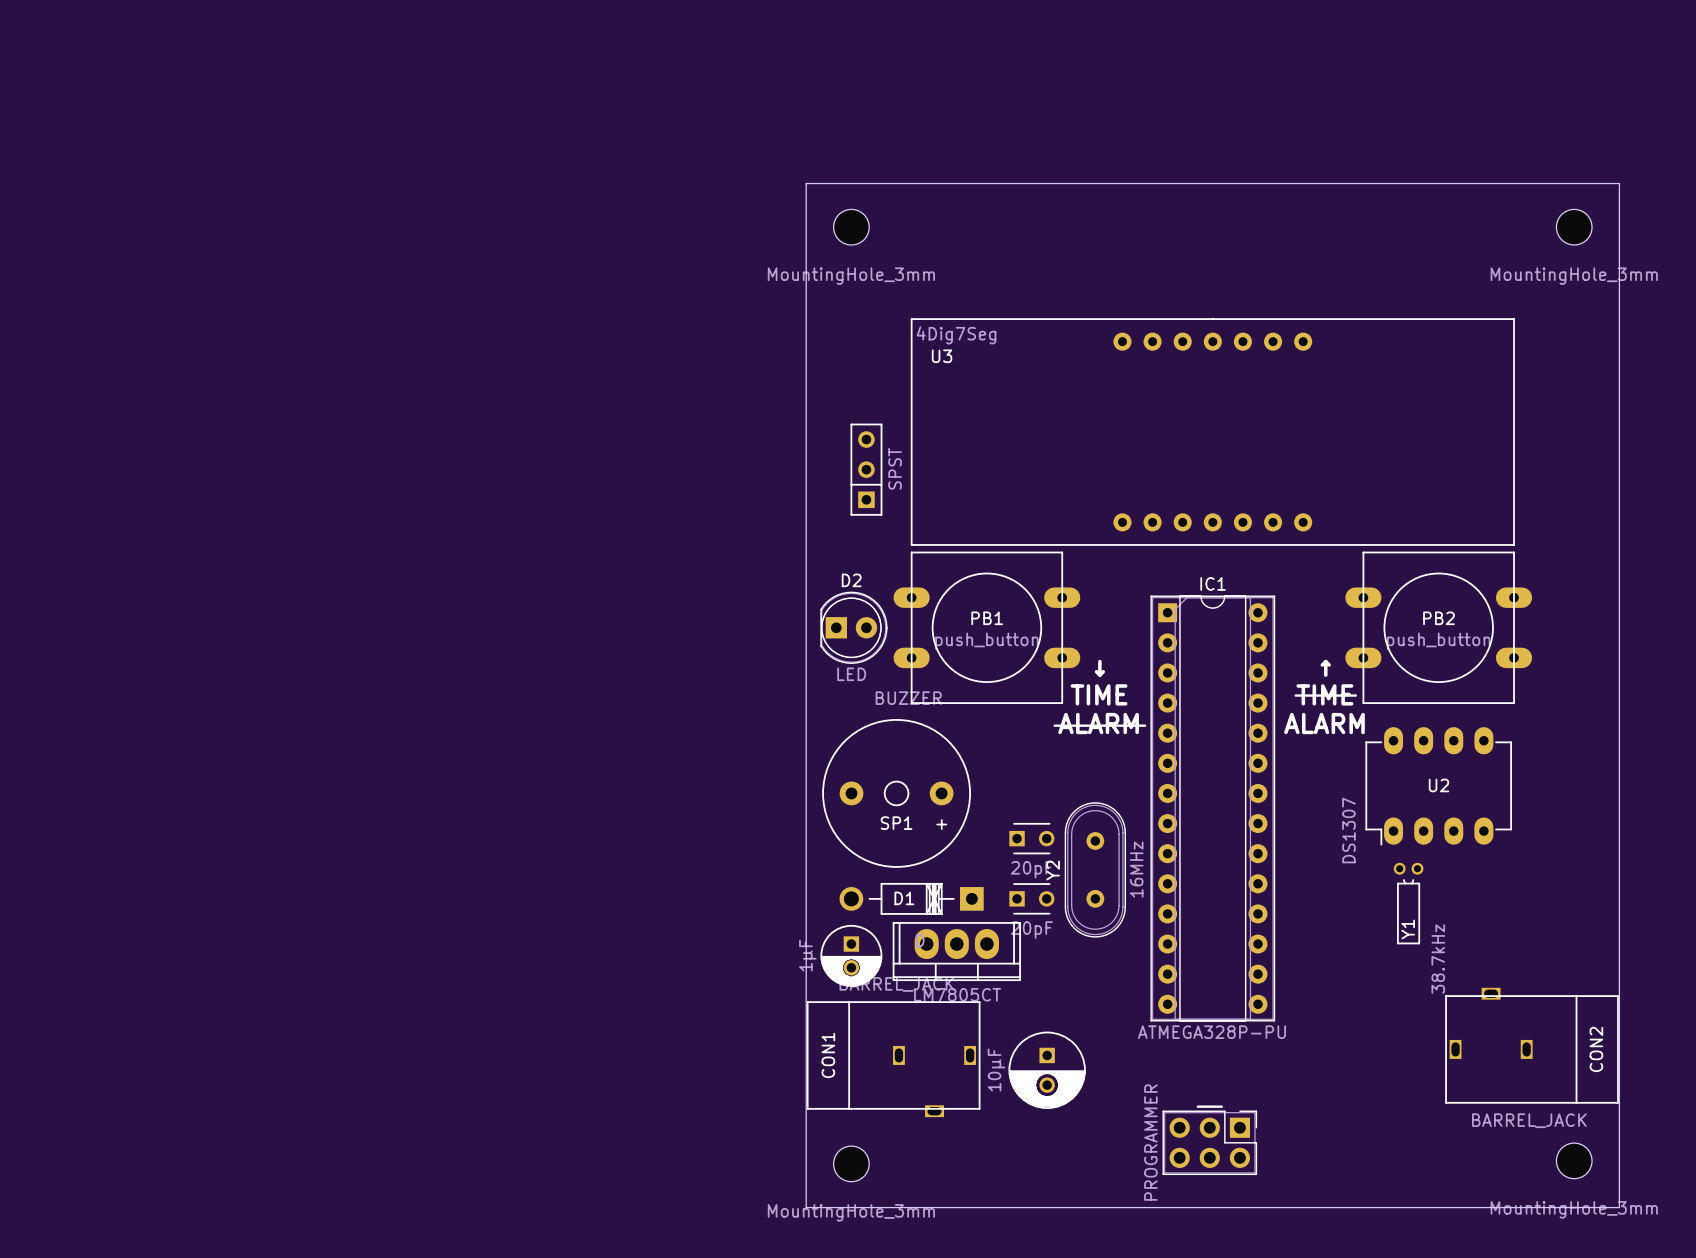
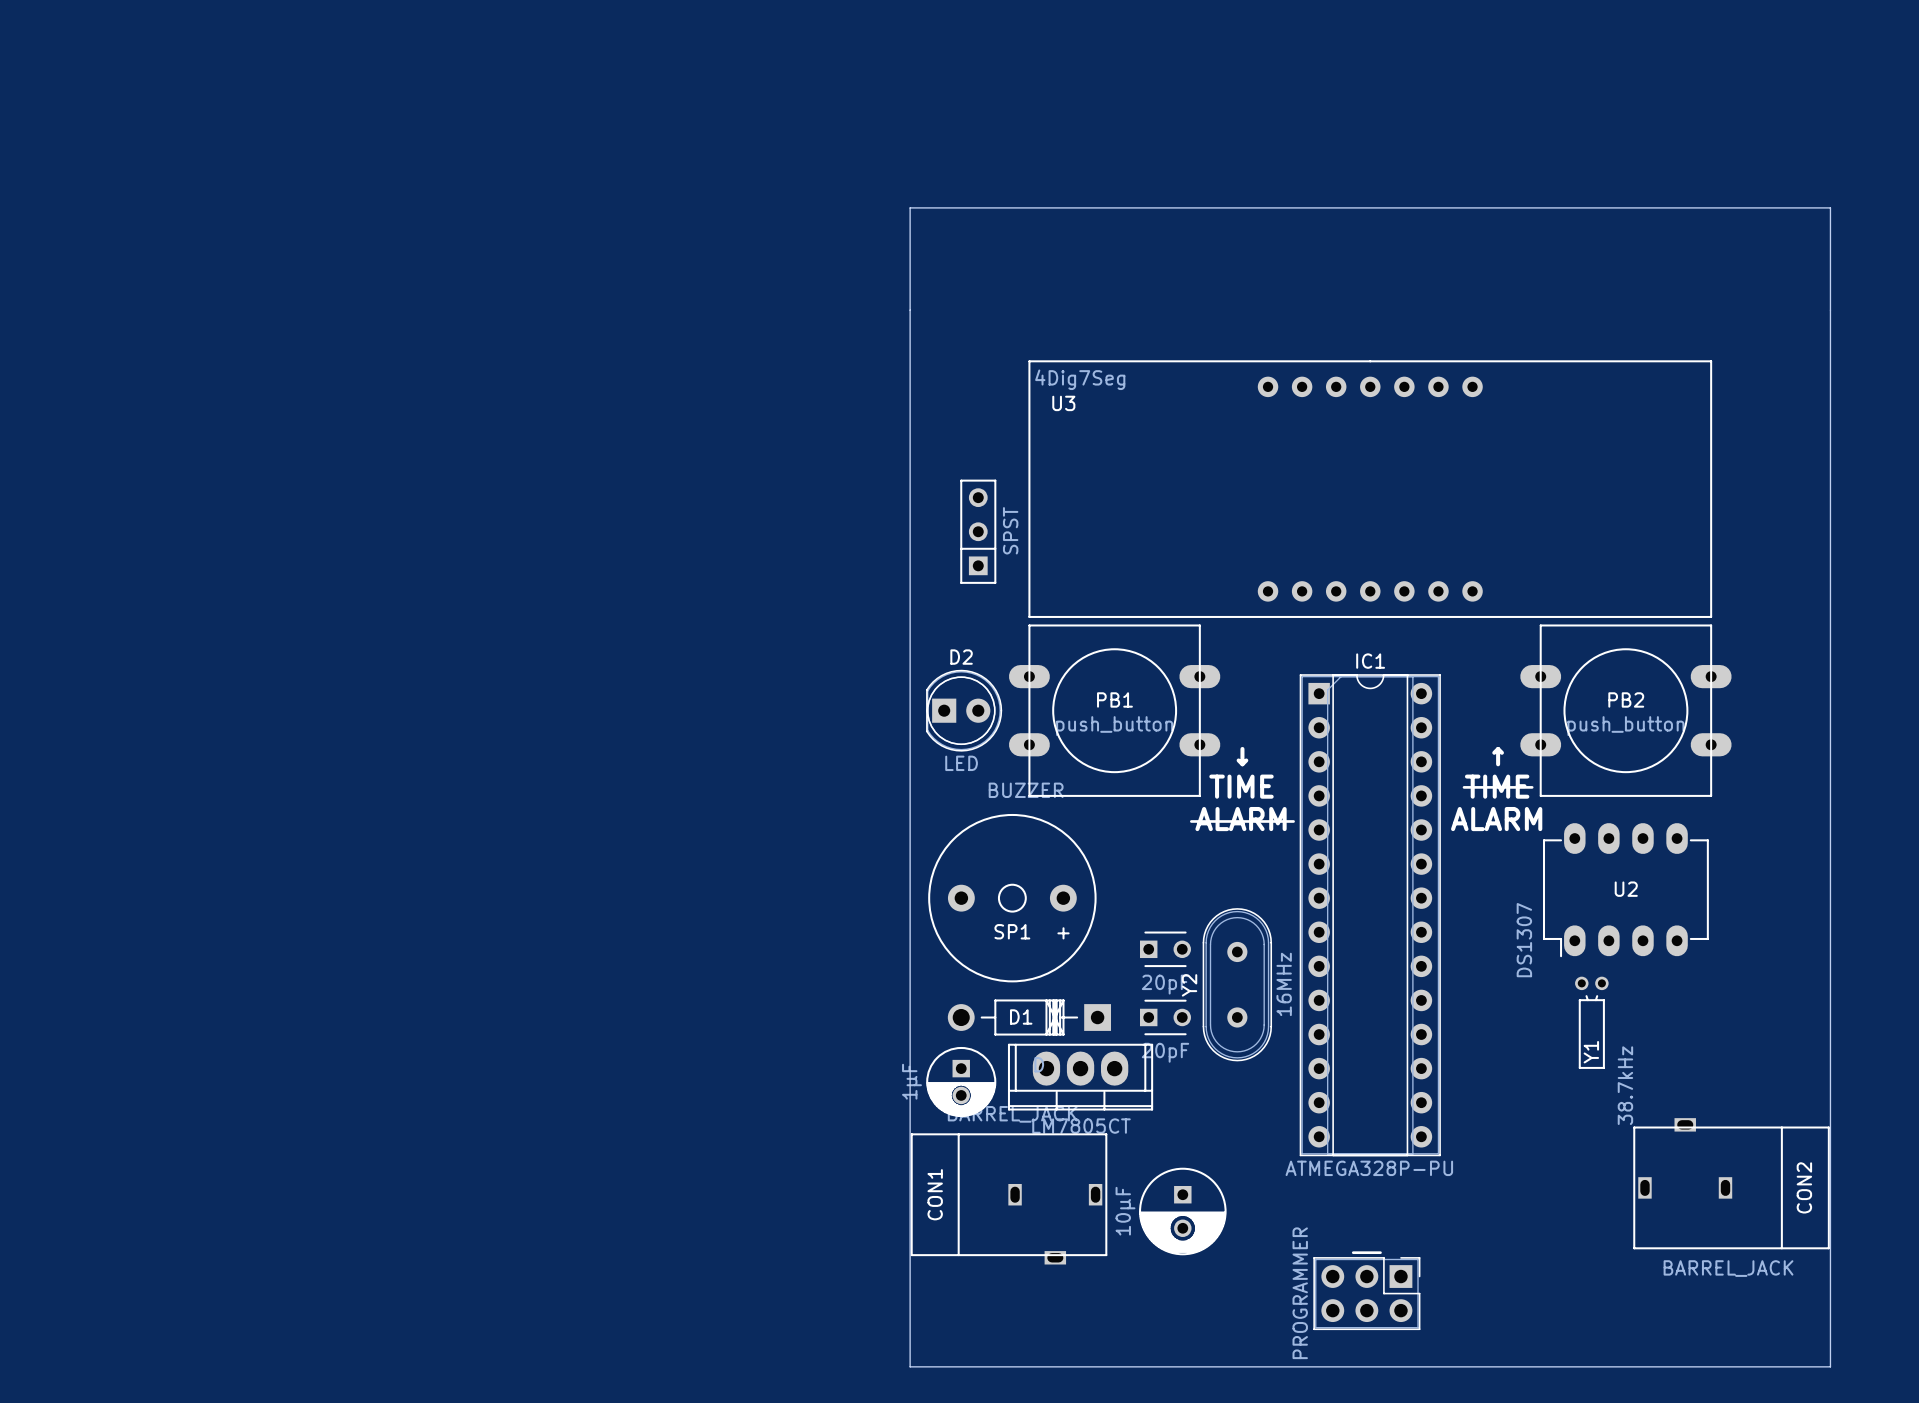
part: MountingHole_3mm (851, 227) -> none
part: MountingHole_3mm (1574, 227) -> none
part: MountingHole_3mm (1574, 1160) -> none
part: MountingHole_3mm (851, 1163) -> none

